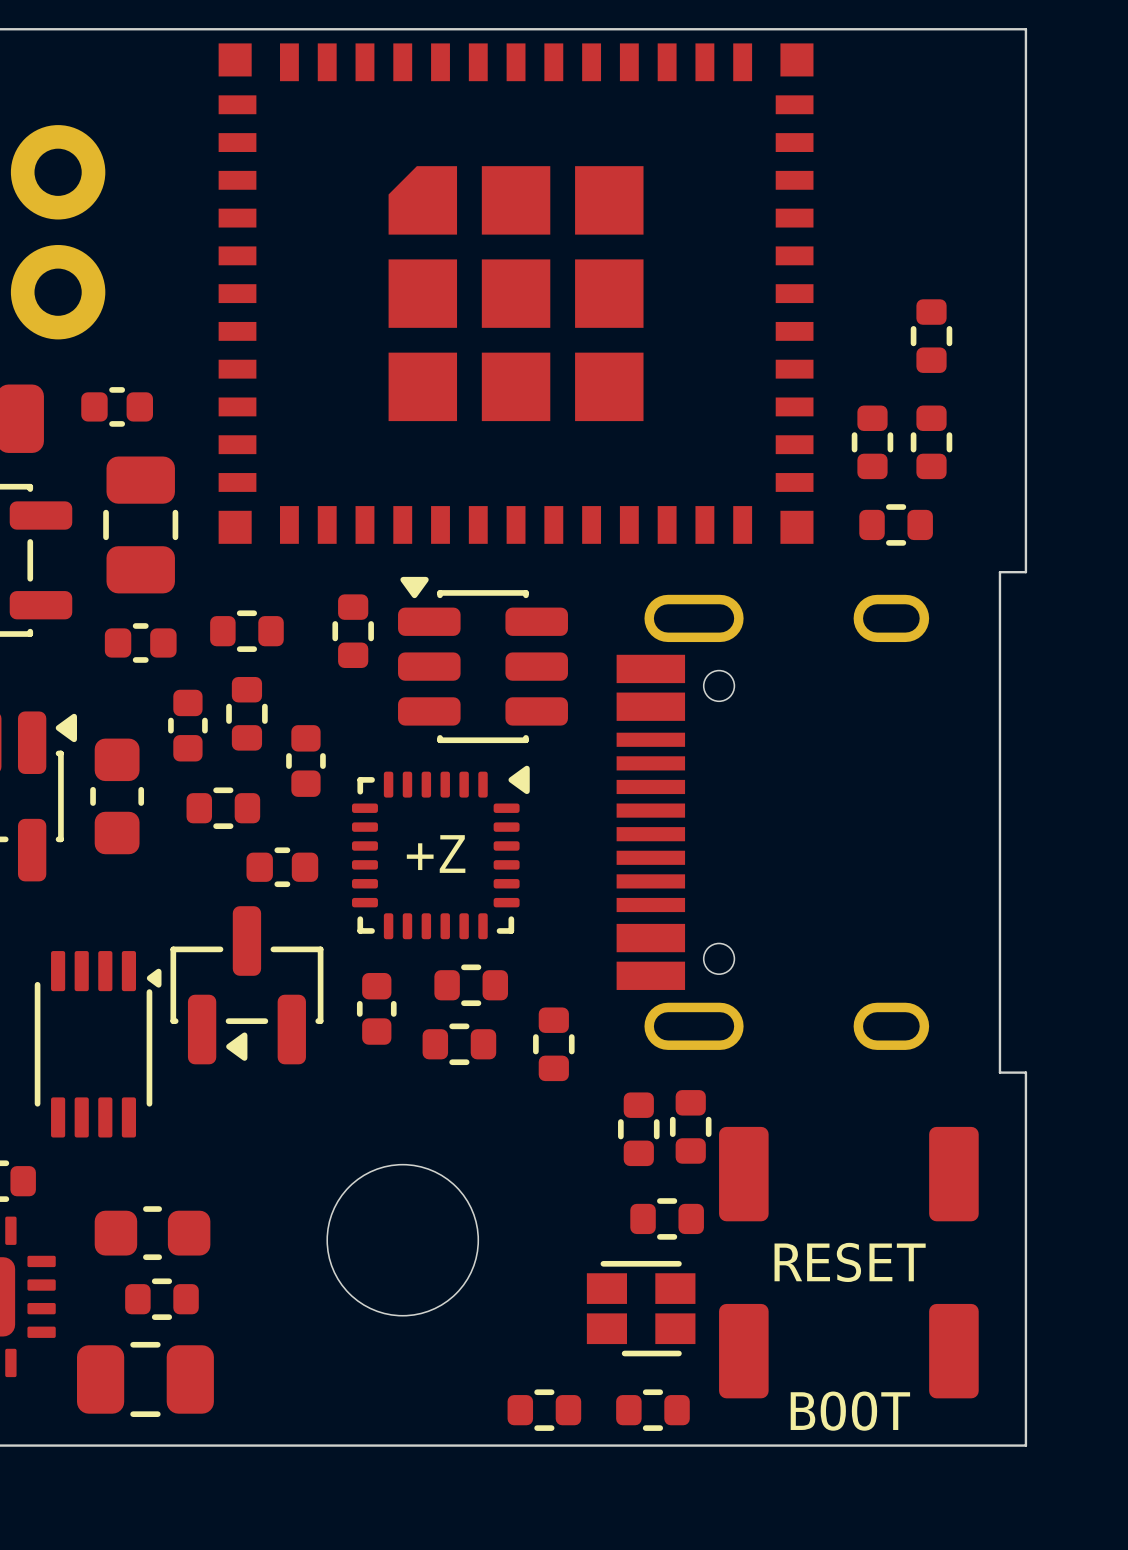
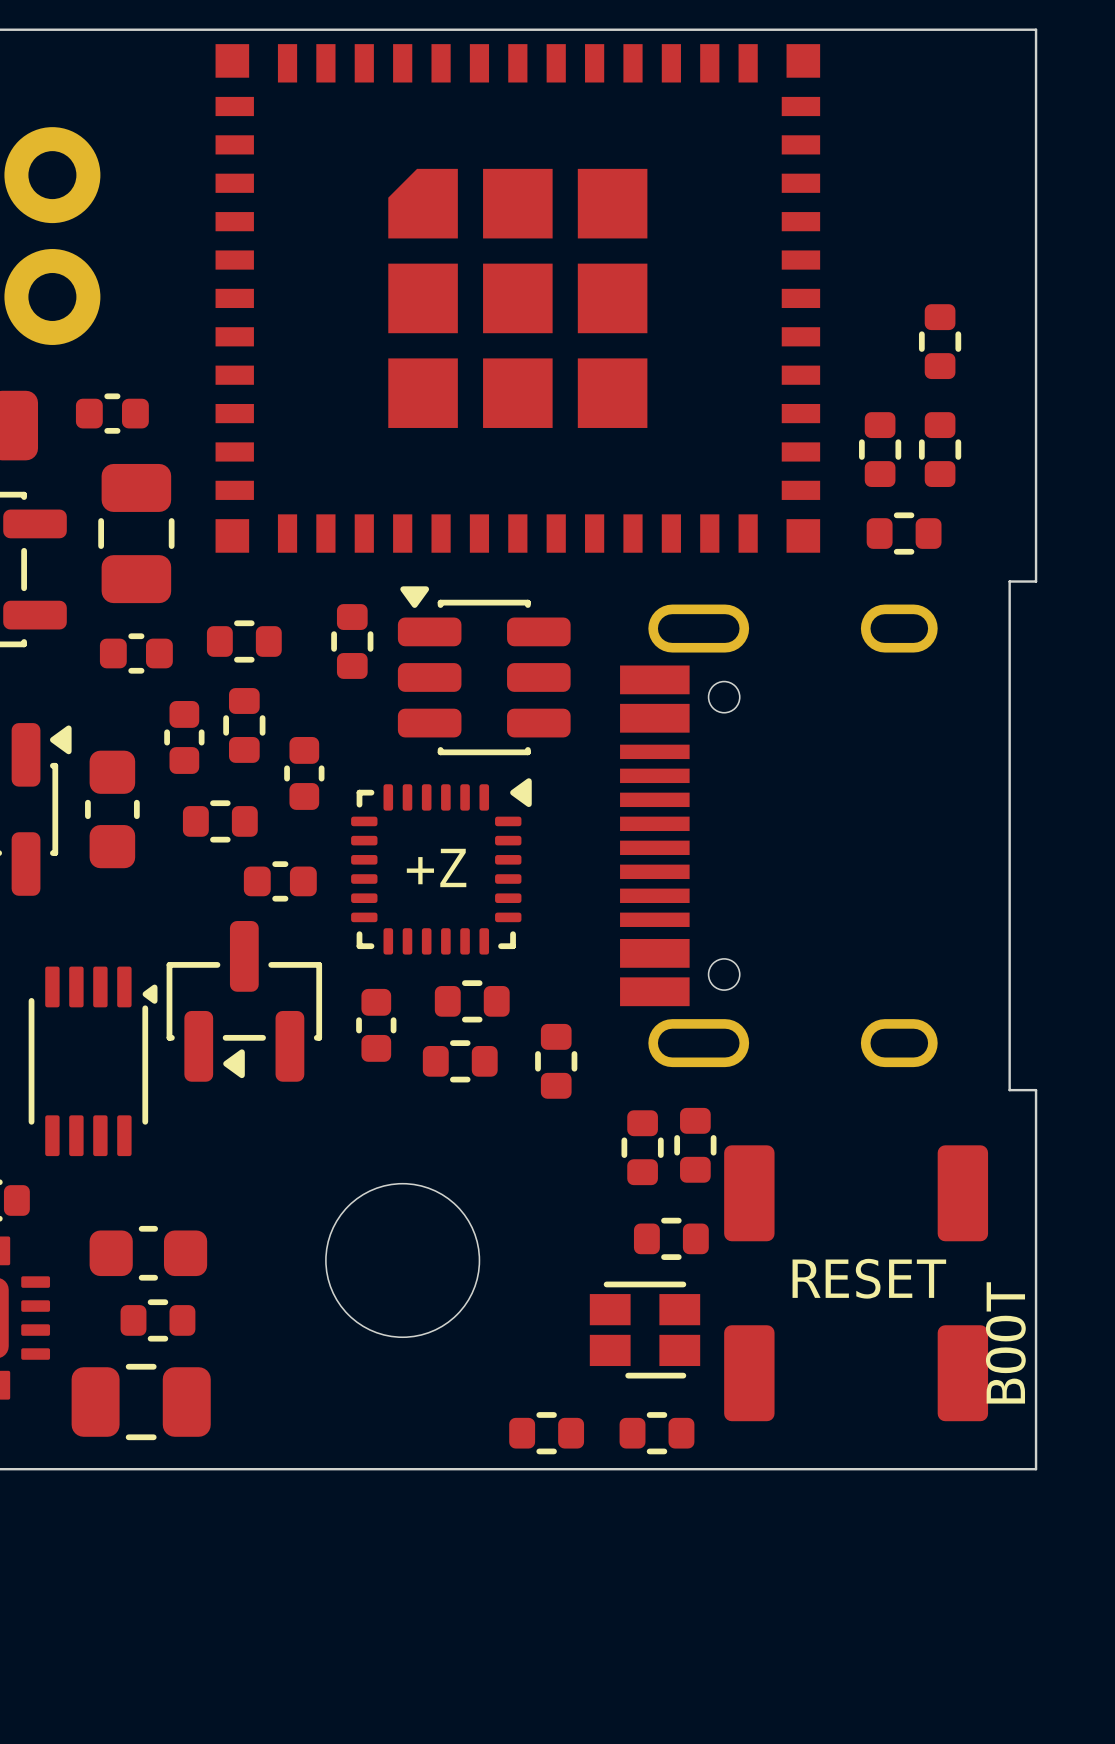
text position: RESET (850, 1262) -> RESET (869, 1278)
text rotation: 0° (850, 1411) -> 90° counterclockwise (1005, 1342)

